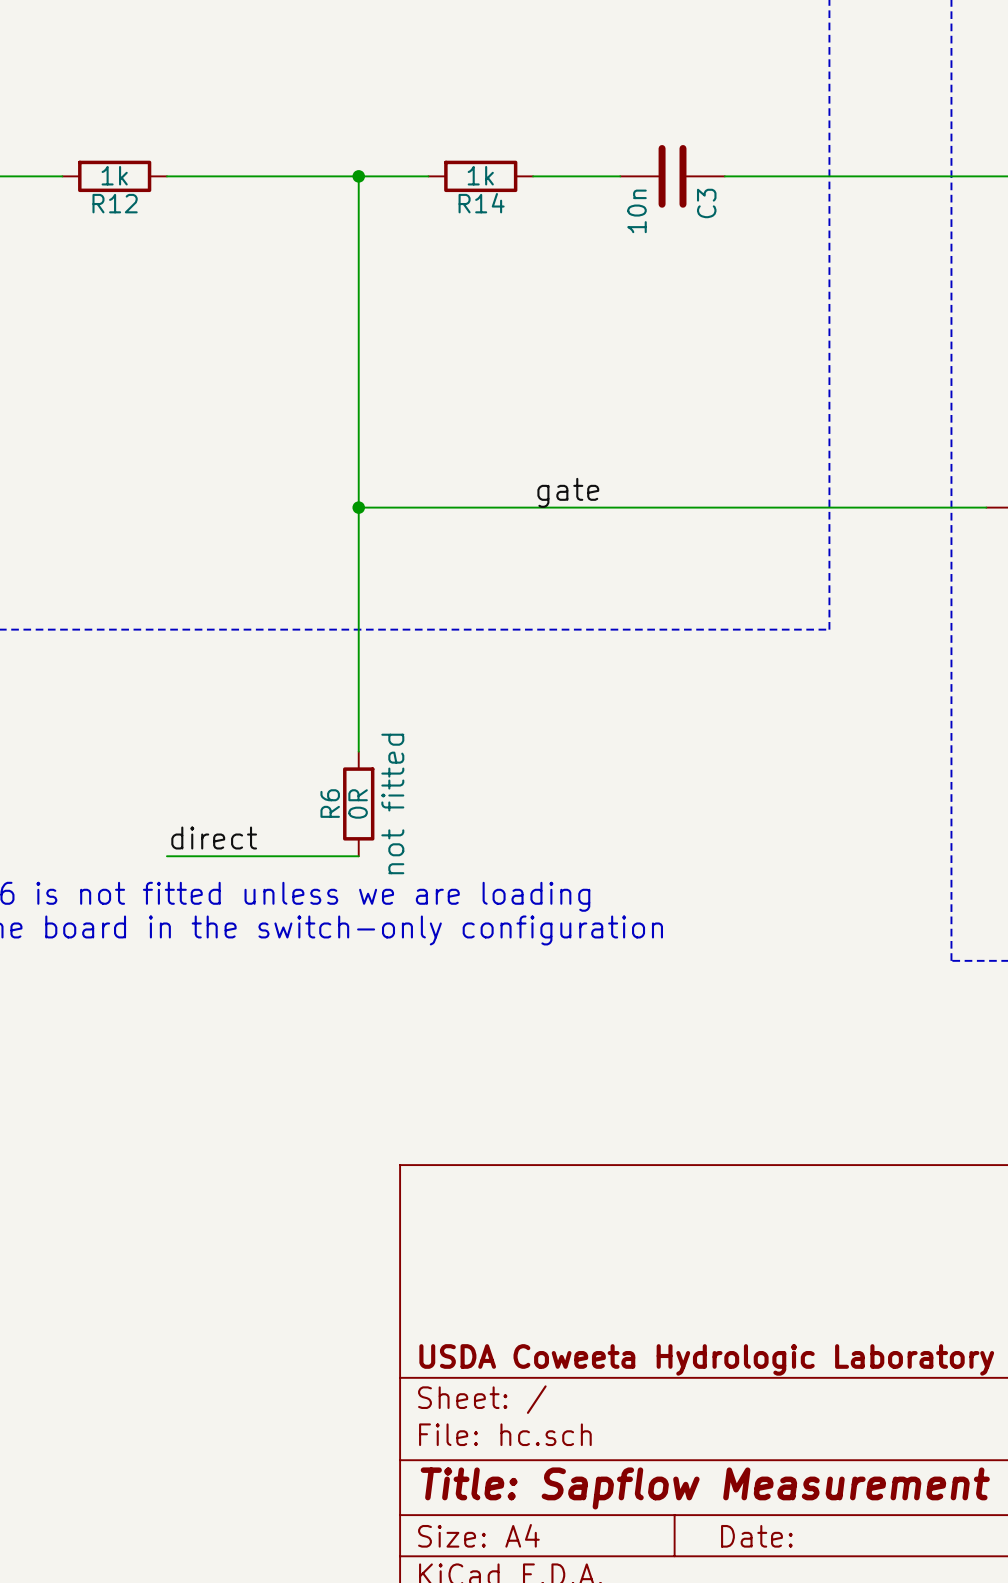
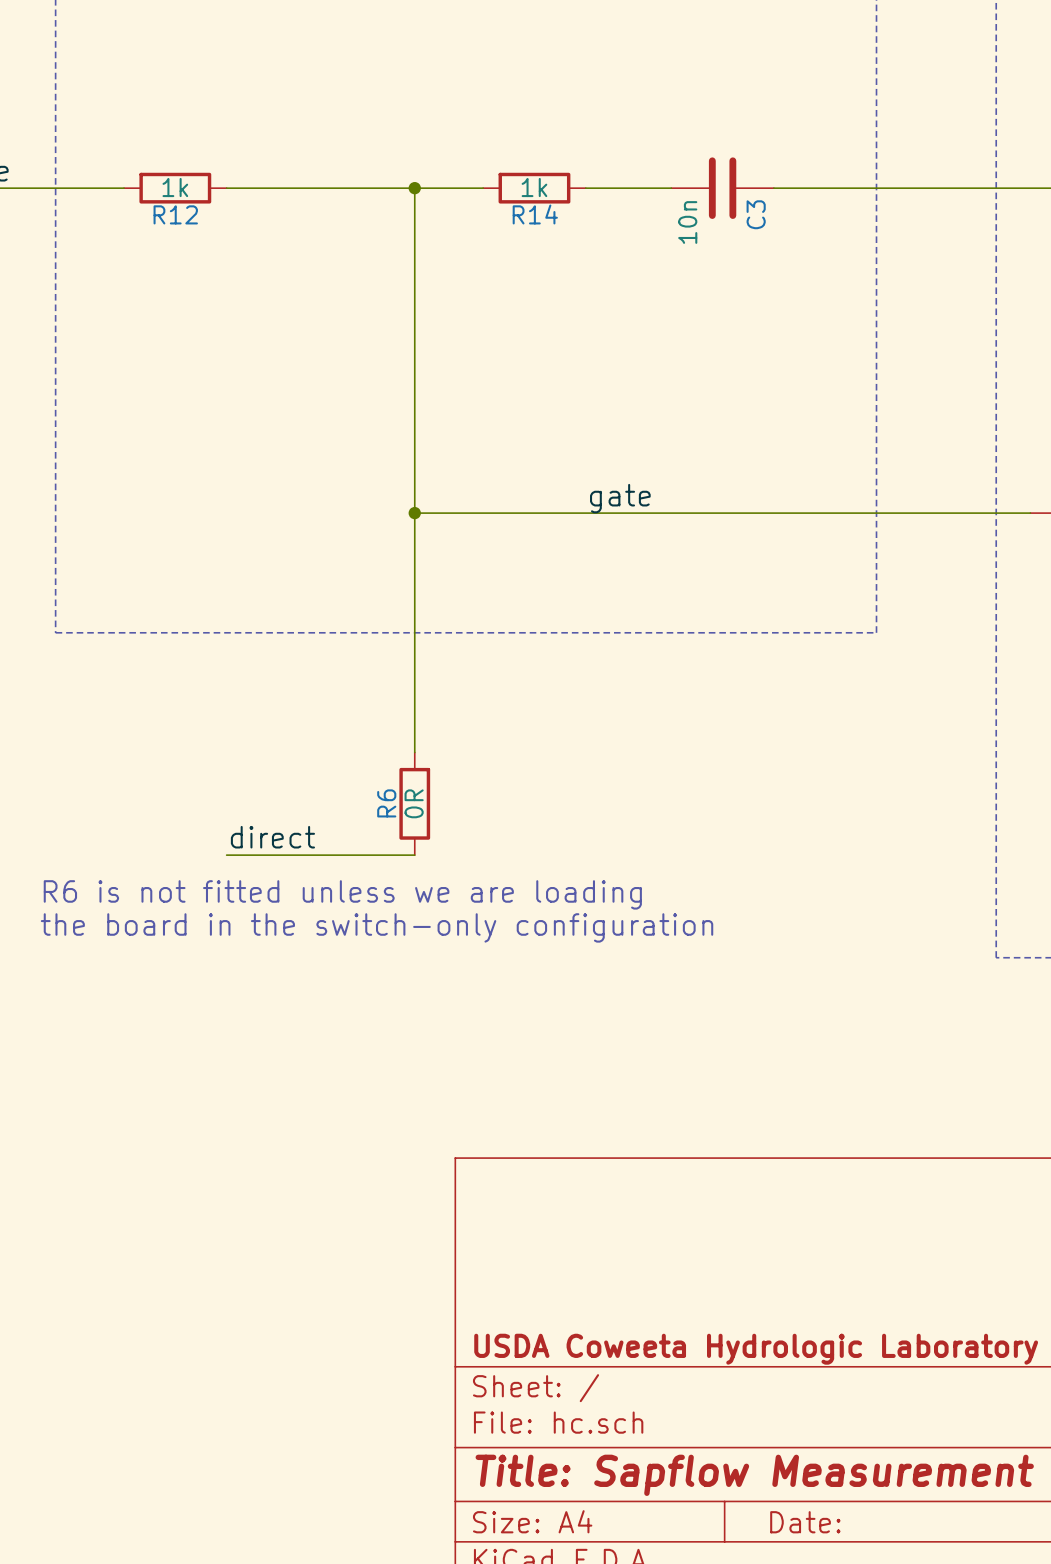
R6 text: not fitted (392, 803) -> none

